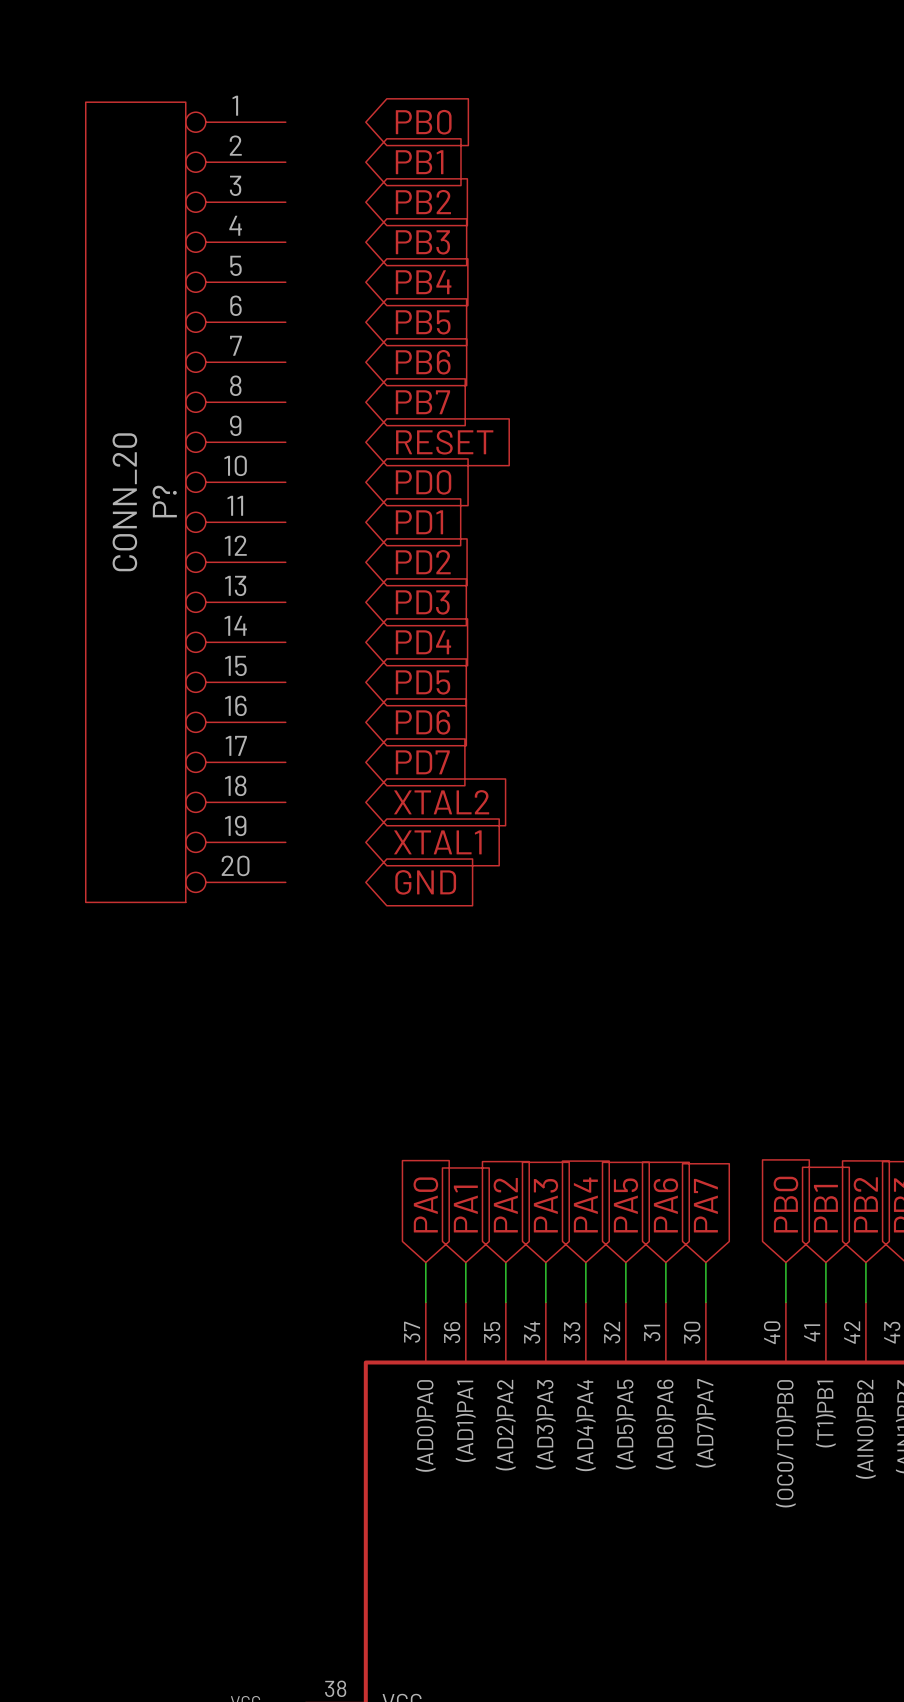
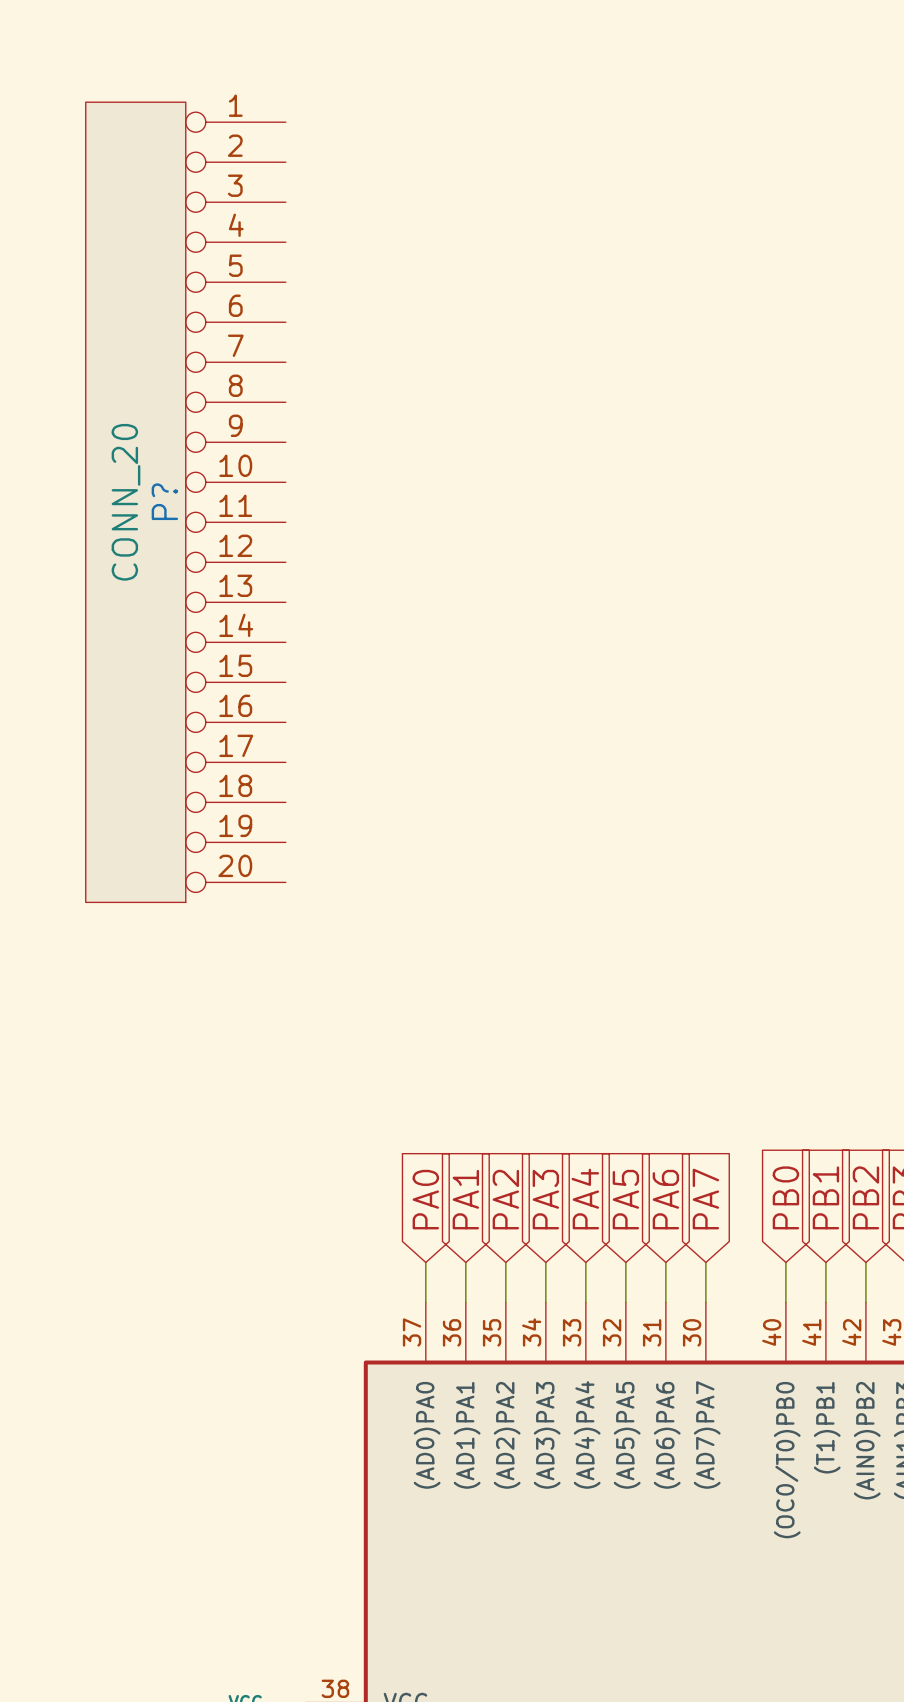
global label: PB0 (423, 122) -> none
global label: PB1 (419, 162) -> none
global label: PB2 (423, 202) -> none
global label: PB3 (422, 242) -> none
global label: PB4 (423, 282) -> none
global label: PB5 (423, 322) -> none
global label: PB6 (423, 362) -> none
global label: PB7 (422, 402) -> none
global label: RESET (444, 442) -> none
global label: PD0 (423, 482) -> none
global label: PD1 (419, 522) -> none
global label: PD2 (423, 562) -> none
global label: PD3 (422, 602) -> none
global label: PD4 (423, 642) -> none
global label: PD5 (423, 682) -> none
global label: PD6 (423, 722) -> none
global label: PD7 (422, 762) -> none
global label: XTAL2 (441, 802) -> none
global label: XTAL1 (437, 842) -> none
global label: GND (425, 882) -> none

